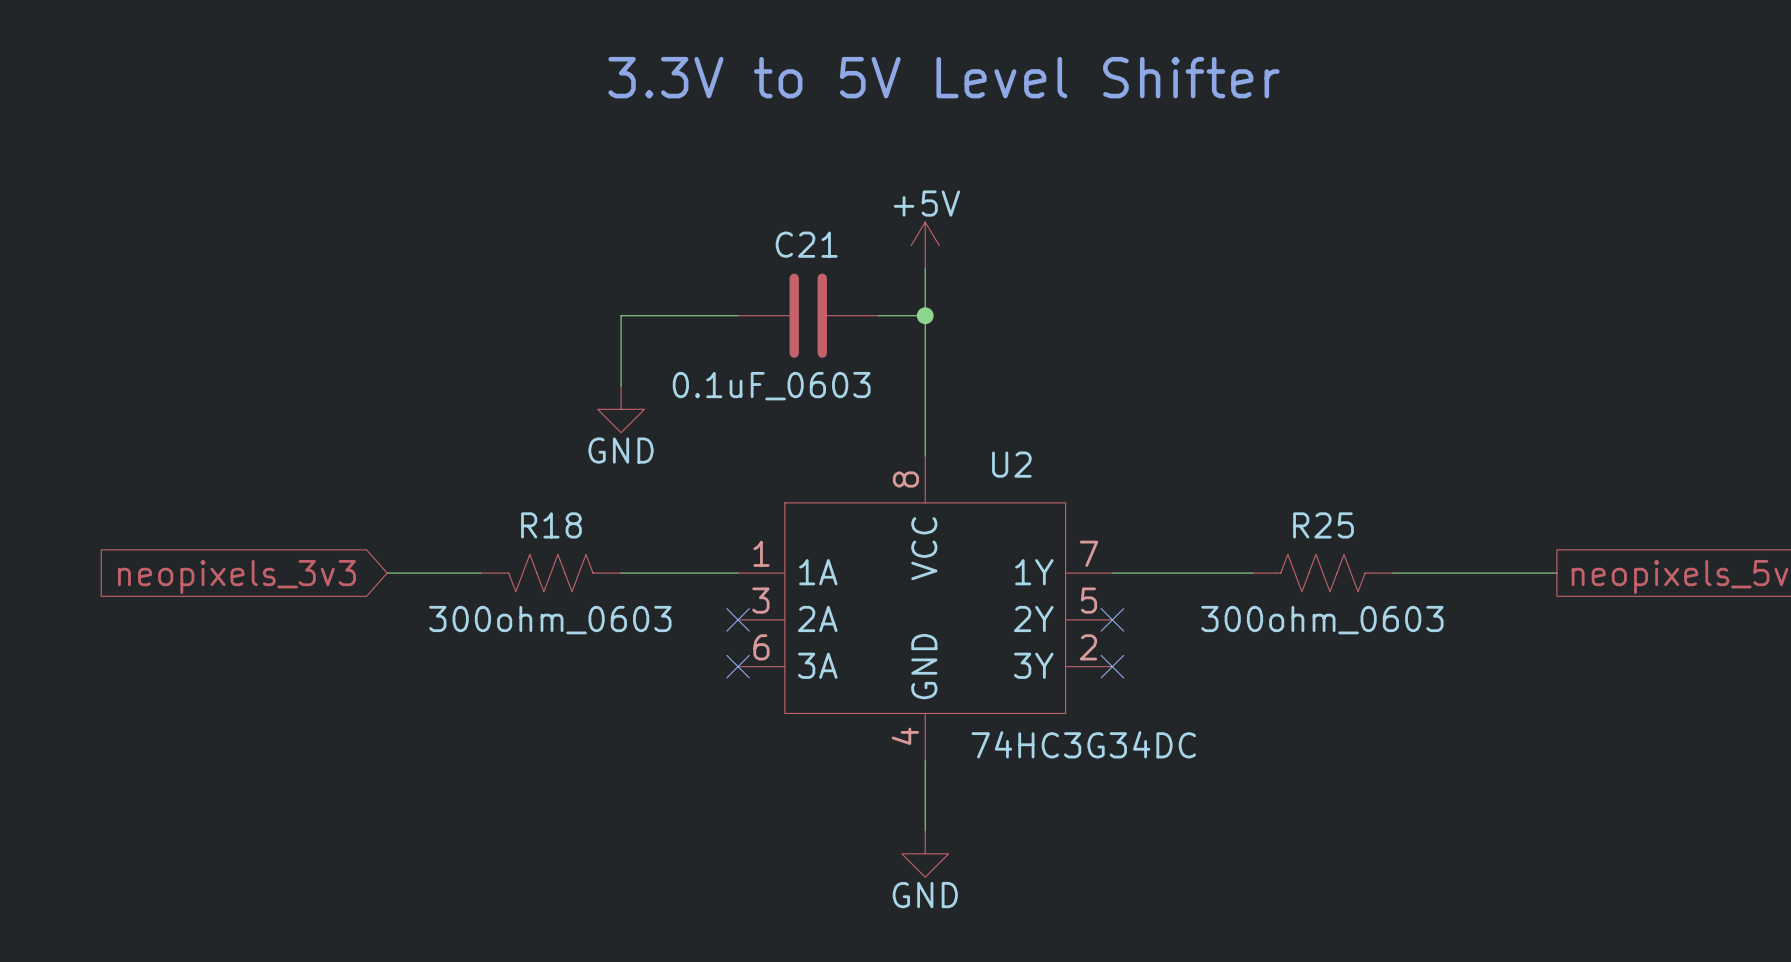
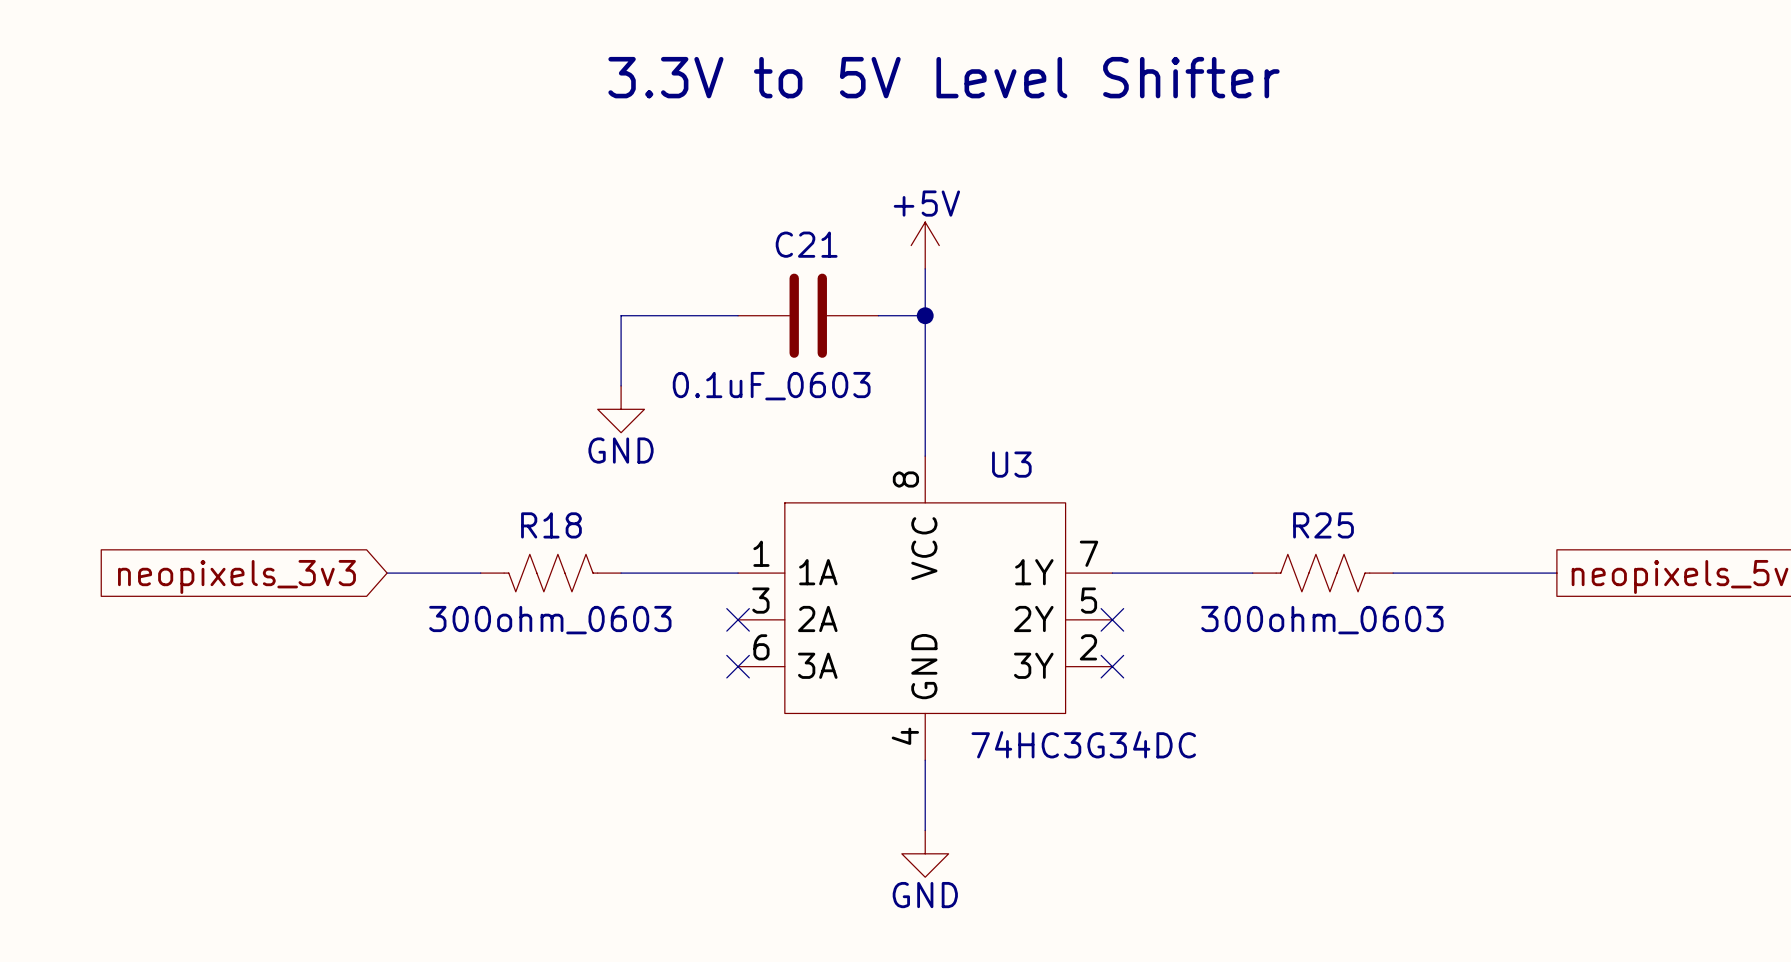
U2 name: U2 (1011, 464) -> U3 (1011, 464)

